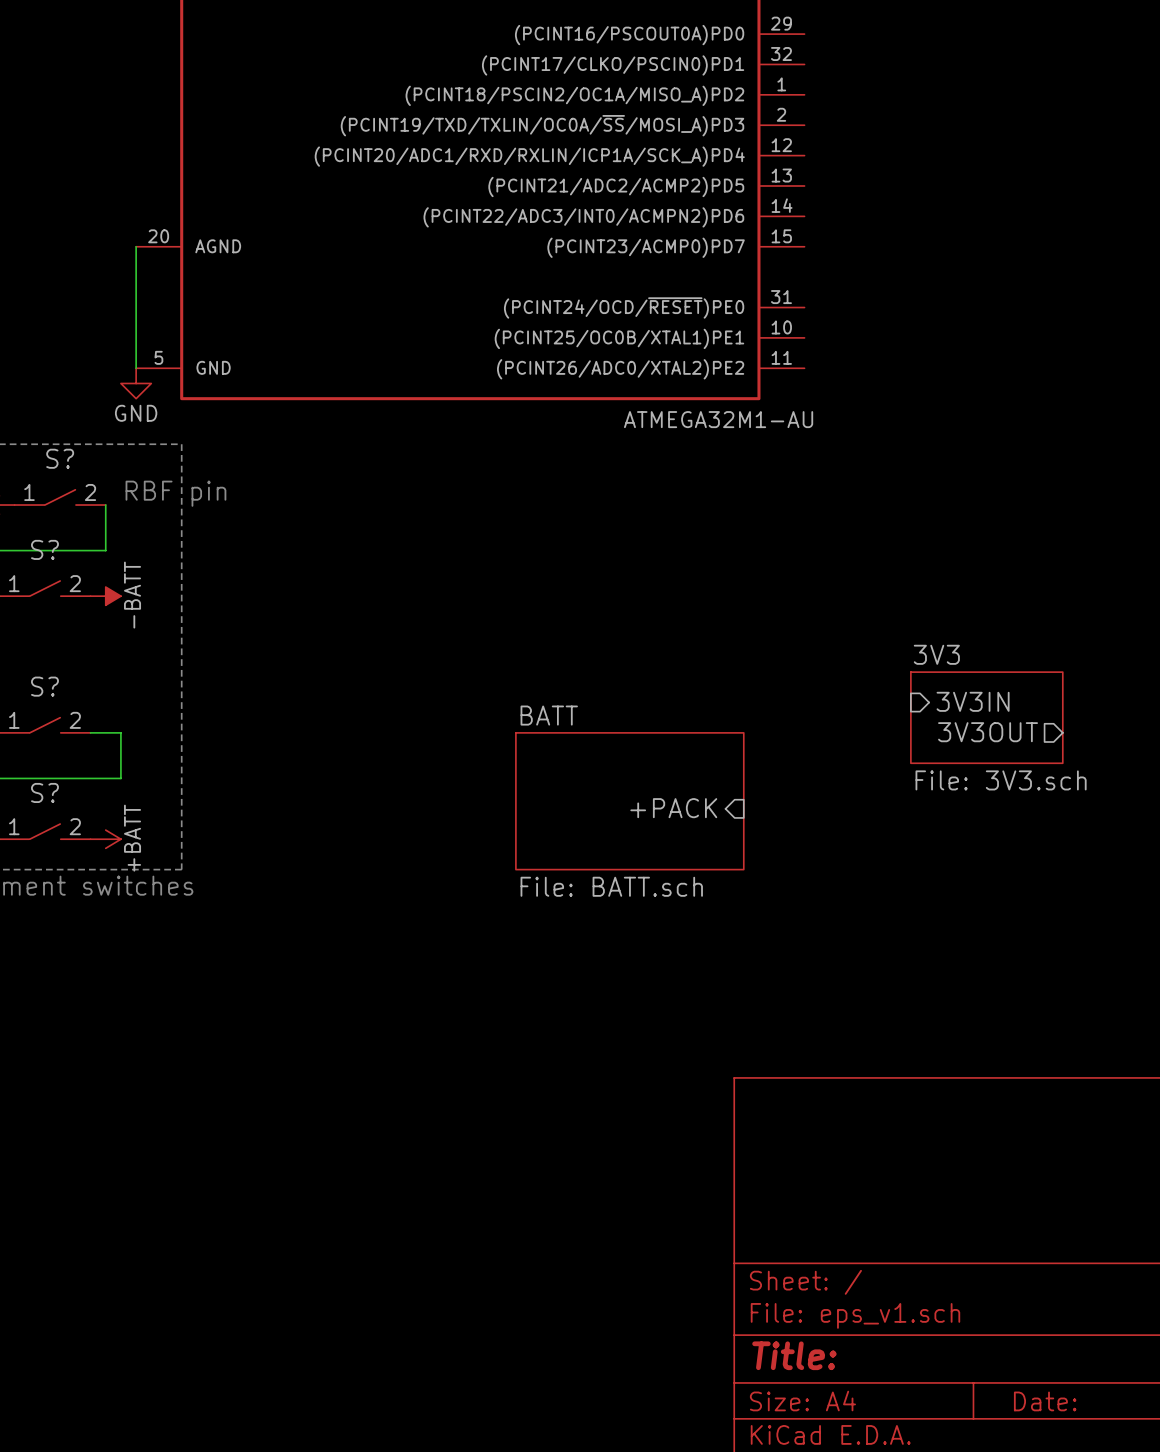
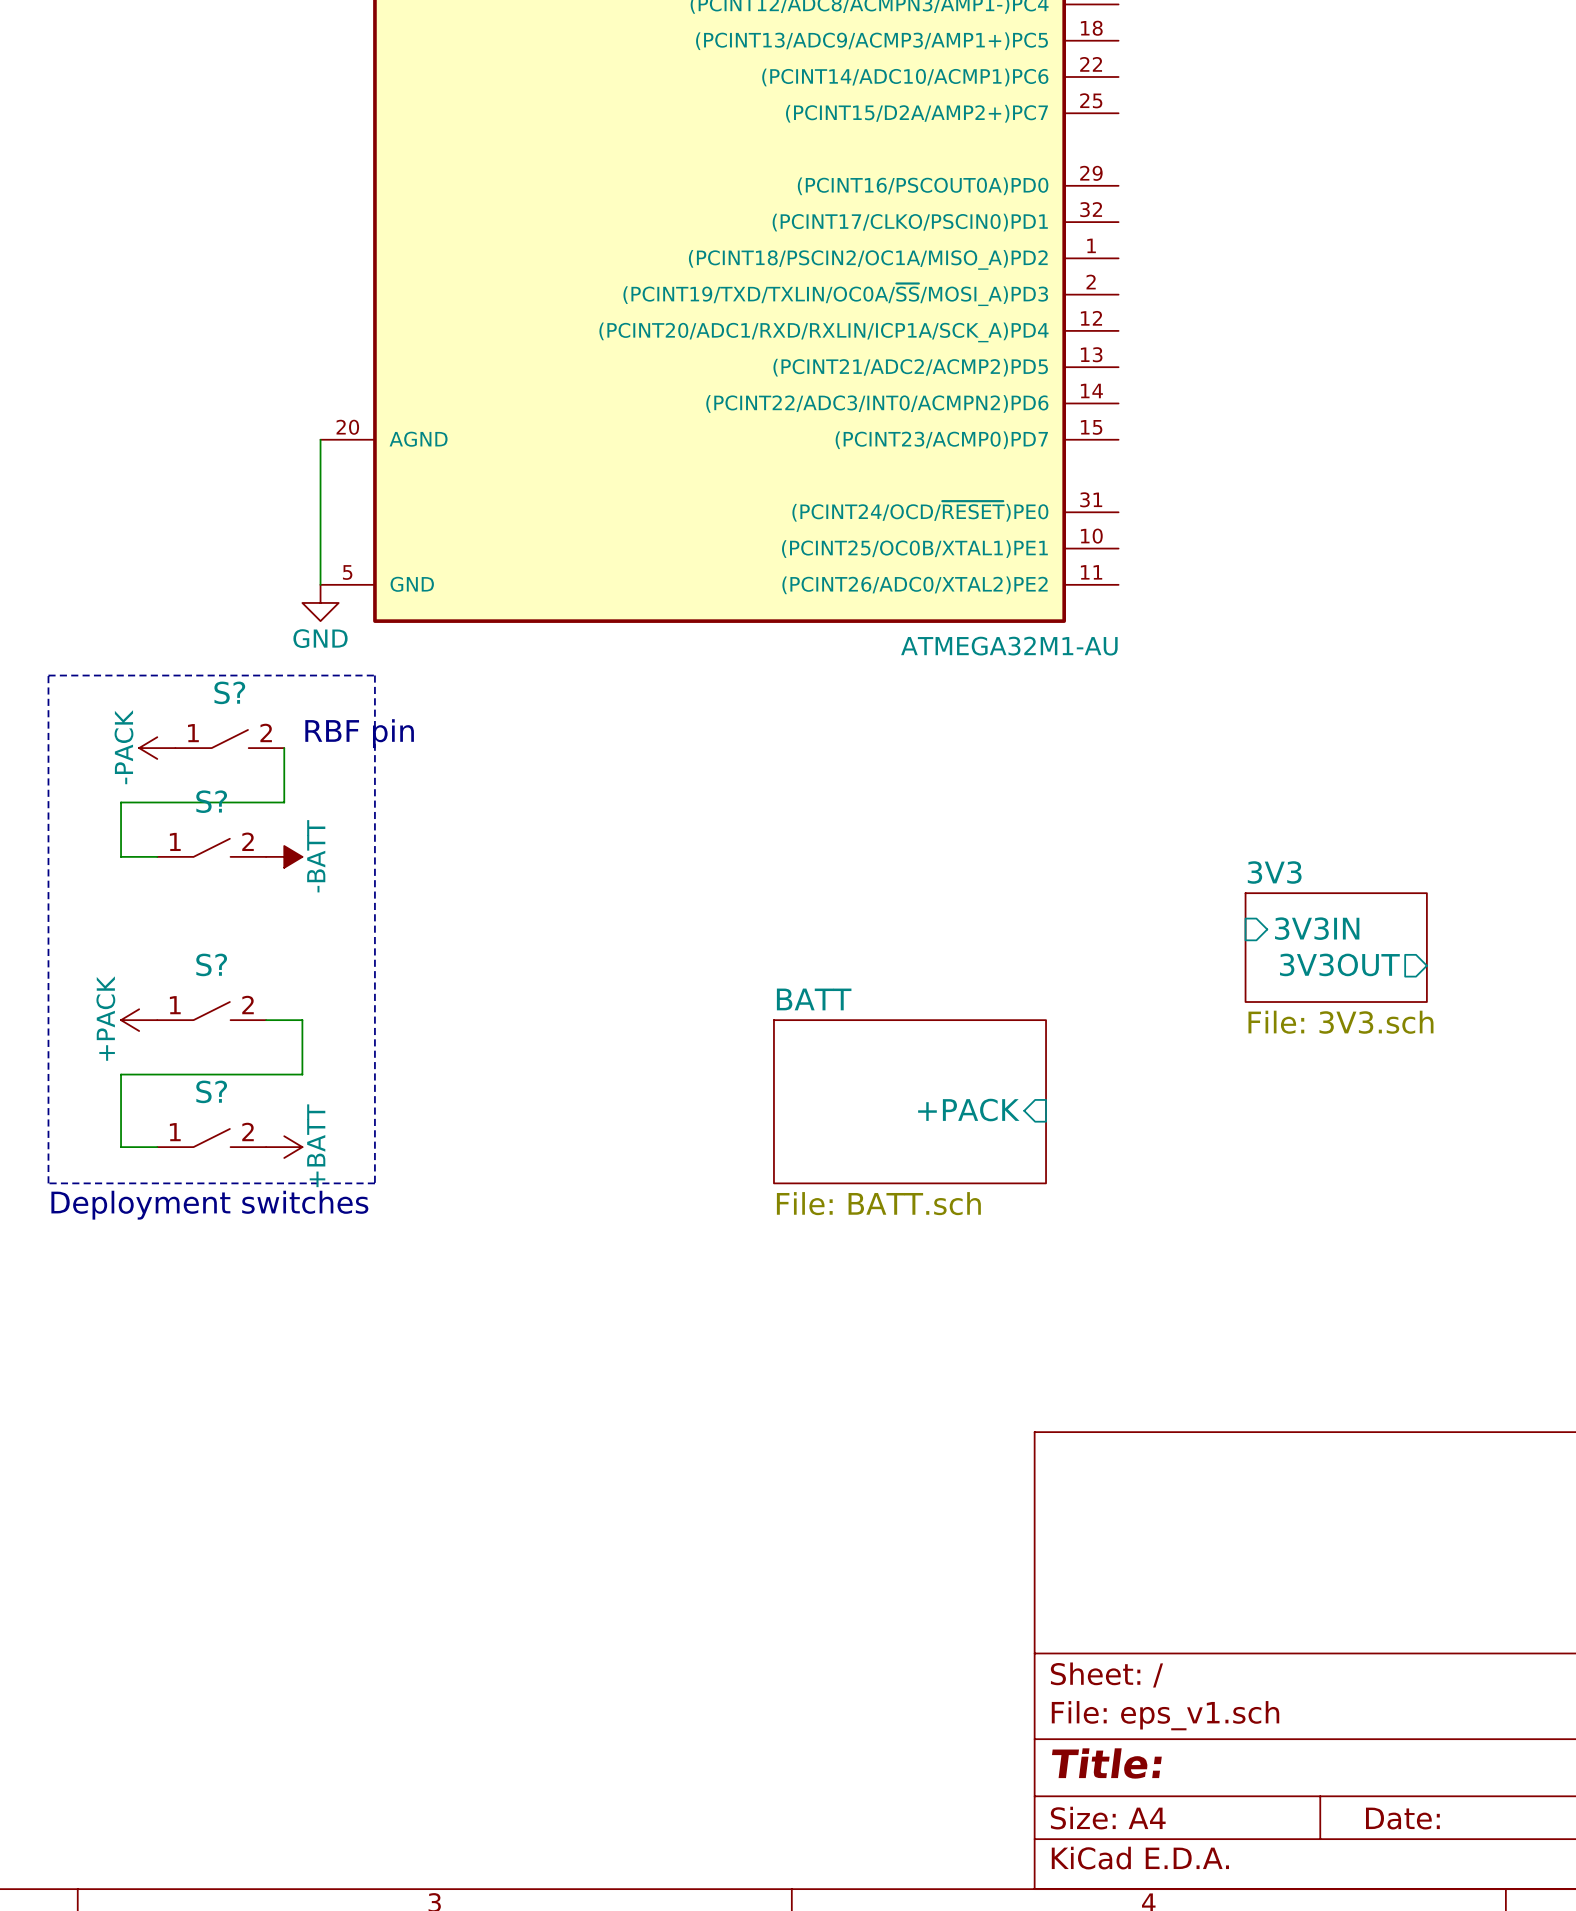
sheet pin position: 3V3IN (973, 701) -> 3V3IN (1317, 928)
sheet 3V3 position: (986, 717) -> (1336, 947)
sheet pin position: 3V3OUT (988, 732) -> 3V3OUT (1339, 964)

